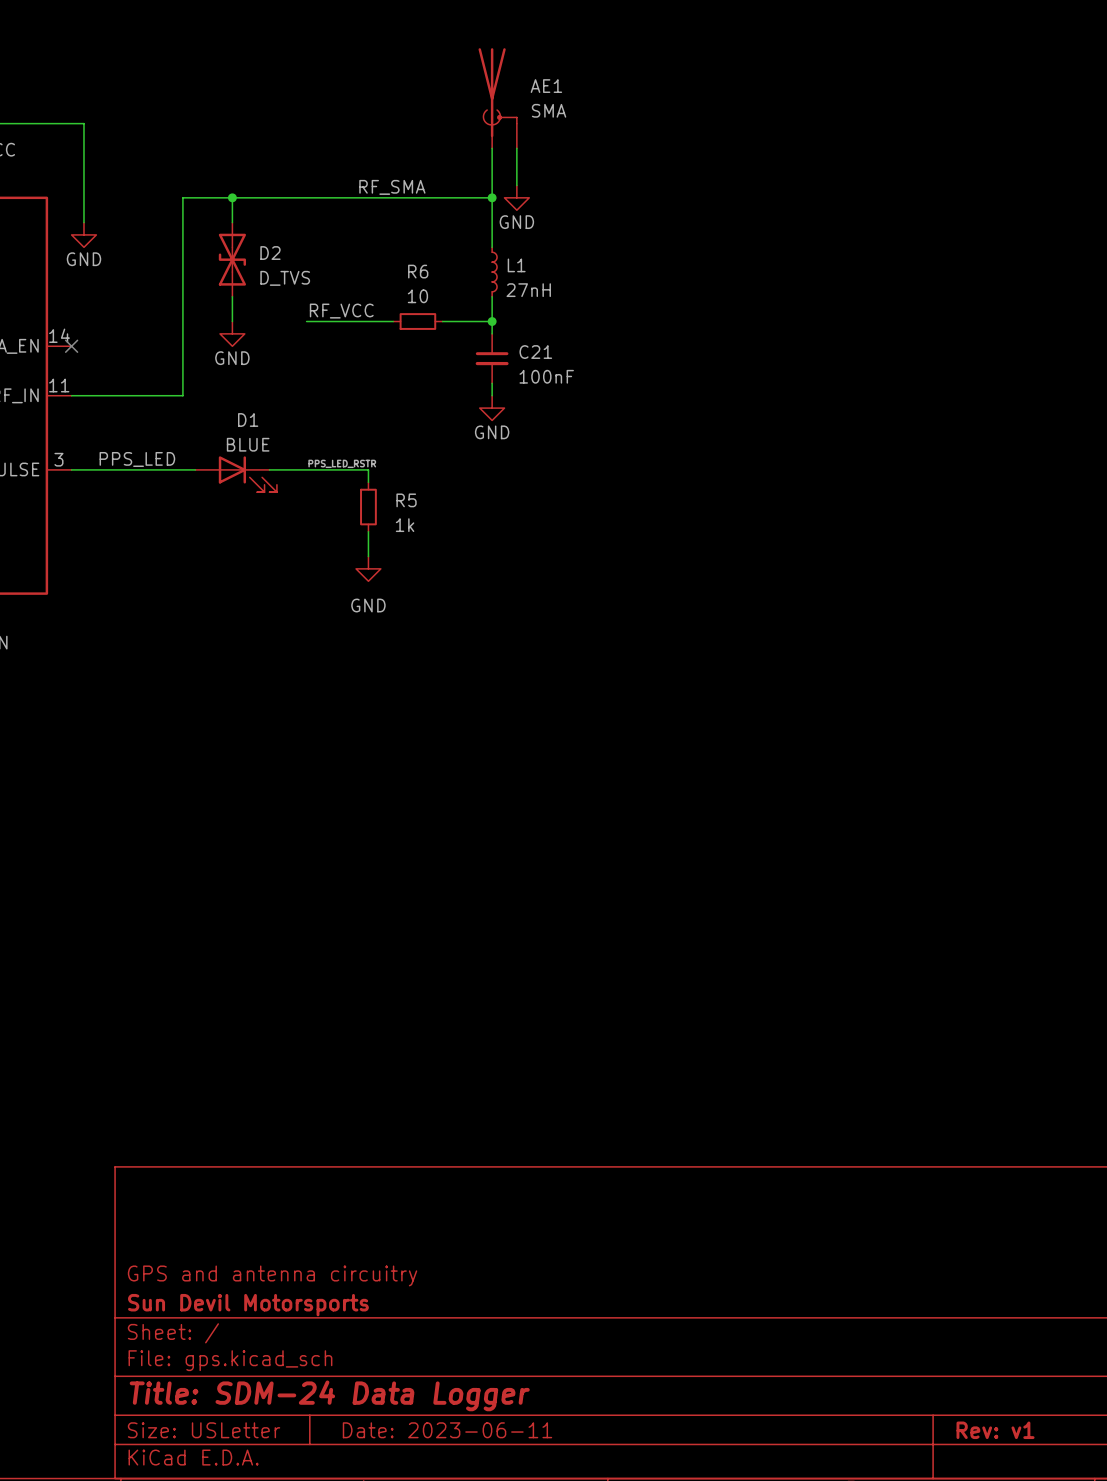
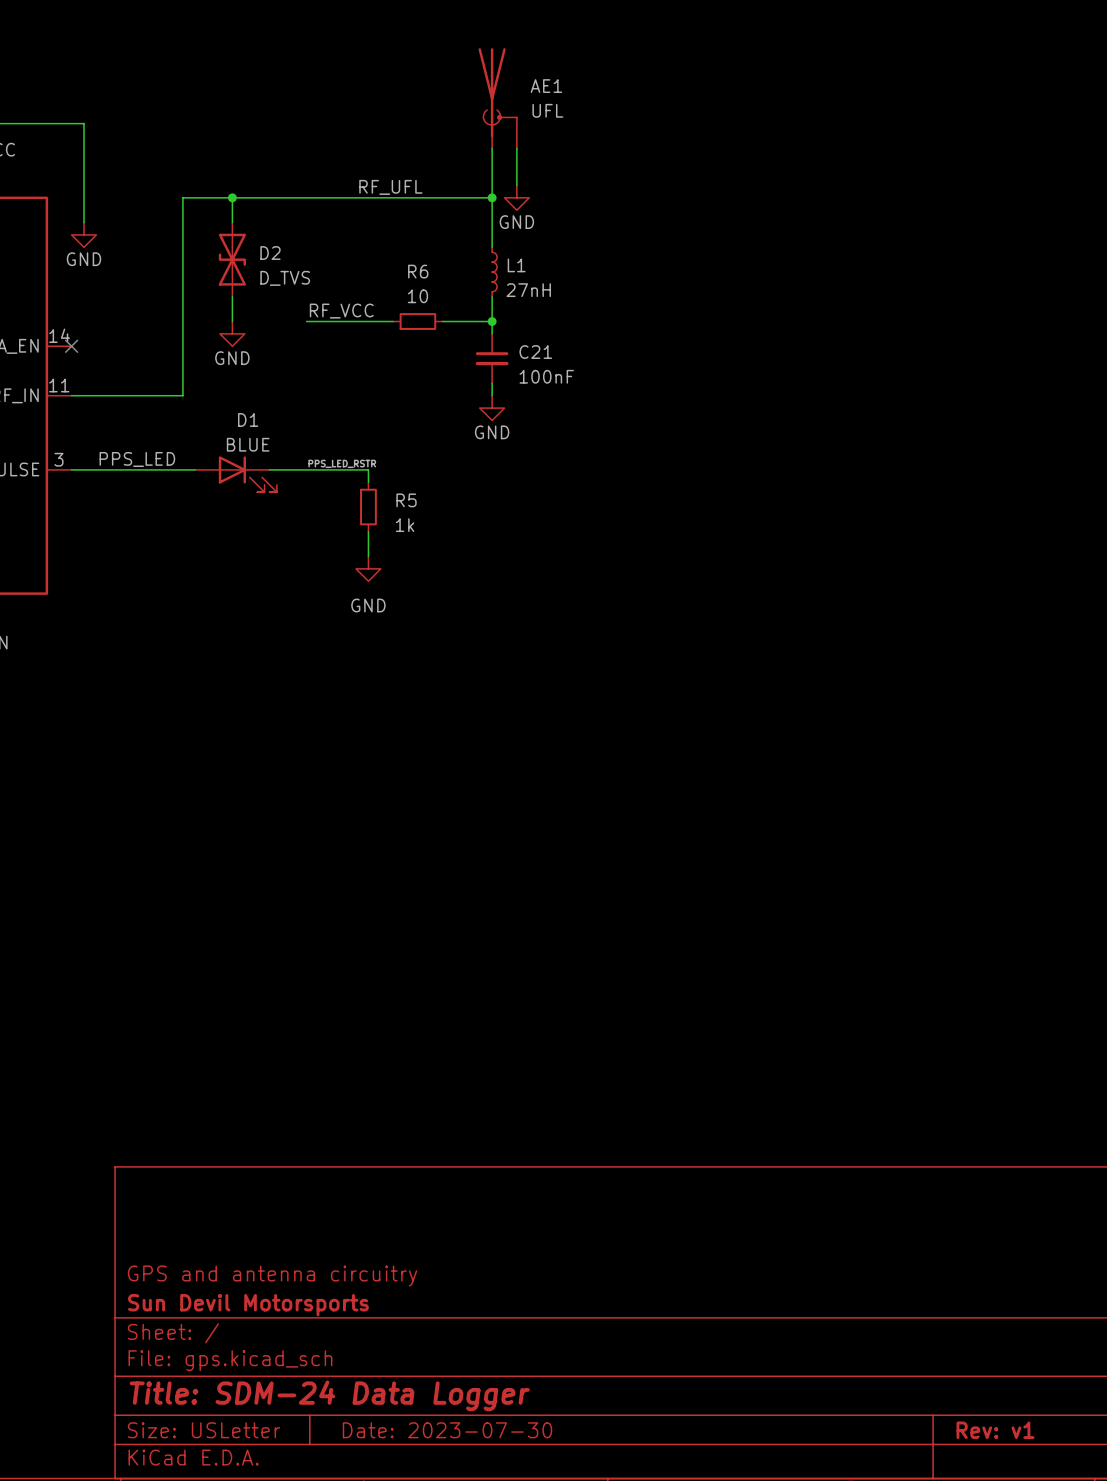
AE1 value: SMA (549, 110) -> UFL (547, 110)
label: RF_SMA (392, 187) -> RF_UFL (390, 187)
title block: Date: 2023-06-11 (447, 1430) -> Date: 2023-07-30 (447, 1430)

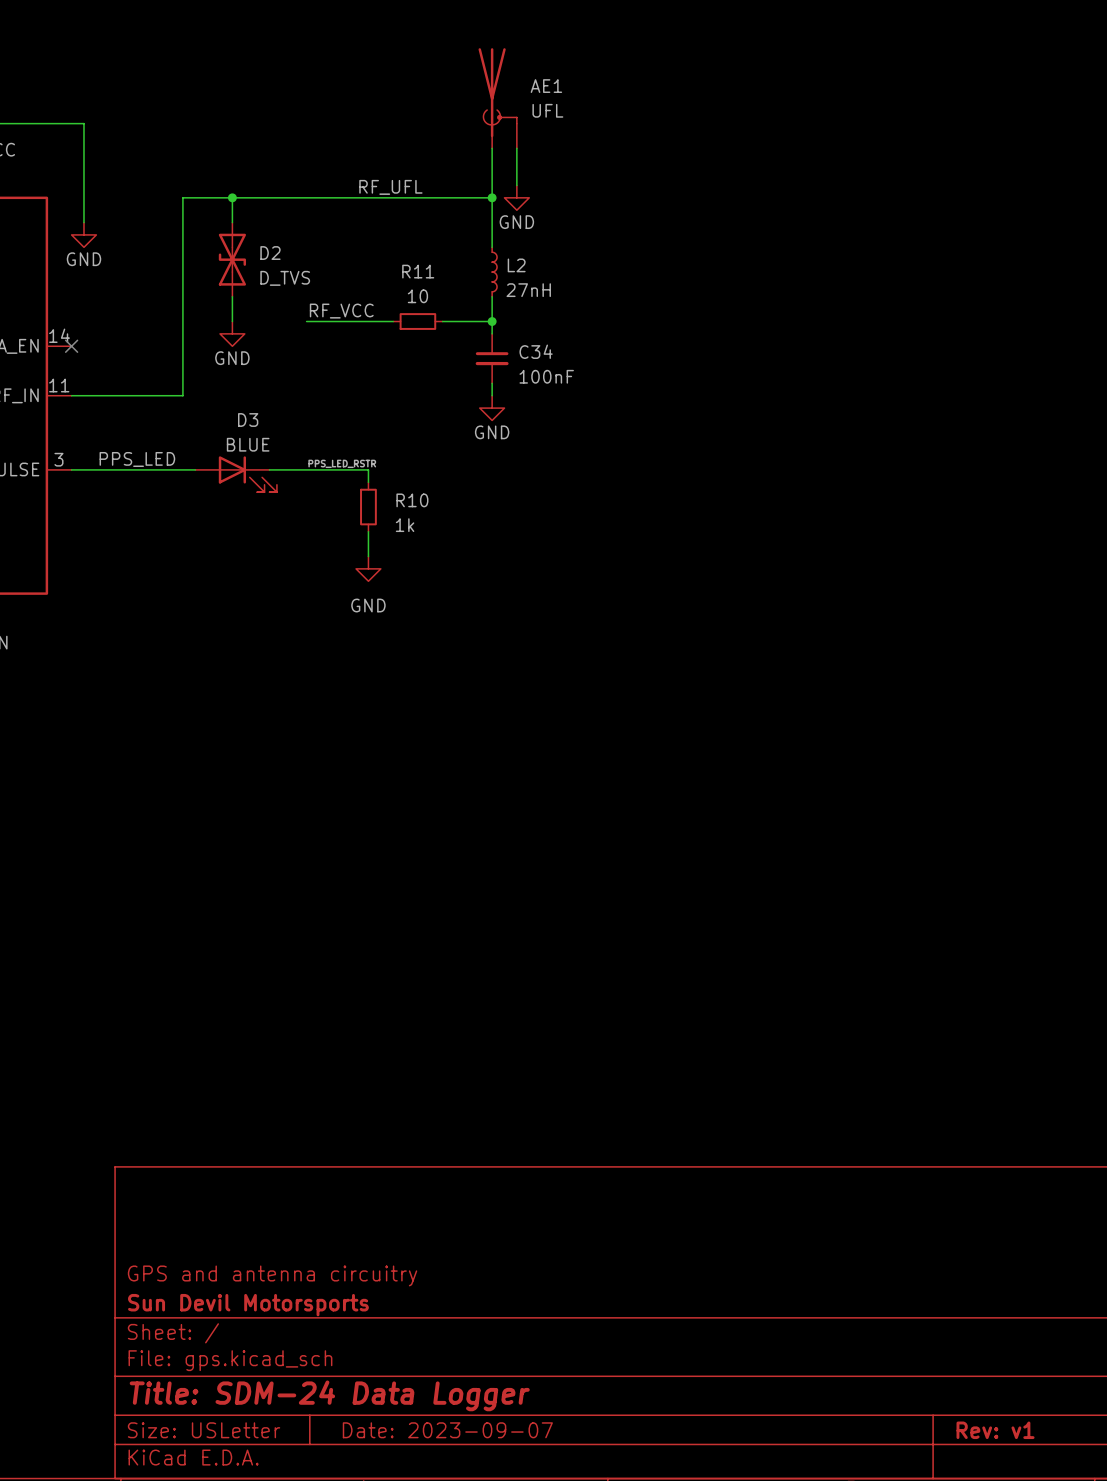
L1 name: L1 (516, 265) -> L2 (516, 265)
R6 name: R6 (418, 271) -> R11 (418, 271)
C21 name: C21 (535, 352) -> C34 (536, 351)
D1 name: D1 (248, 419) -> D3 (248, 419)
R5 name: R5 (406, 500) -> R10 (412, 500)
title block: Date: 2023-07-30 (447, 1430) -> Date: 2023-09-07 (447, 1430)

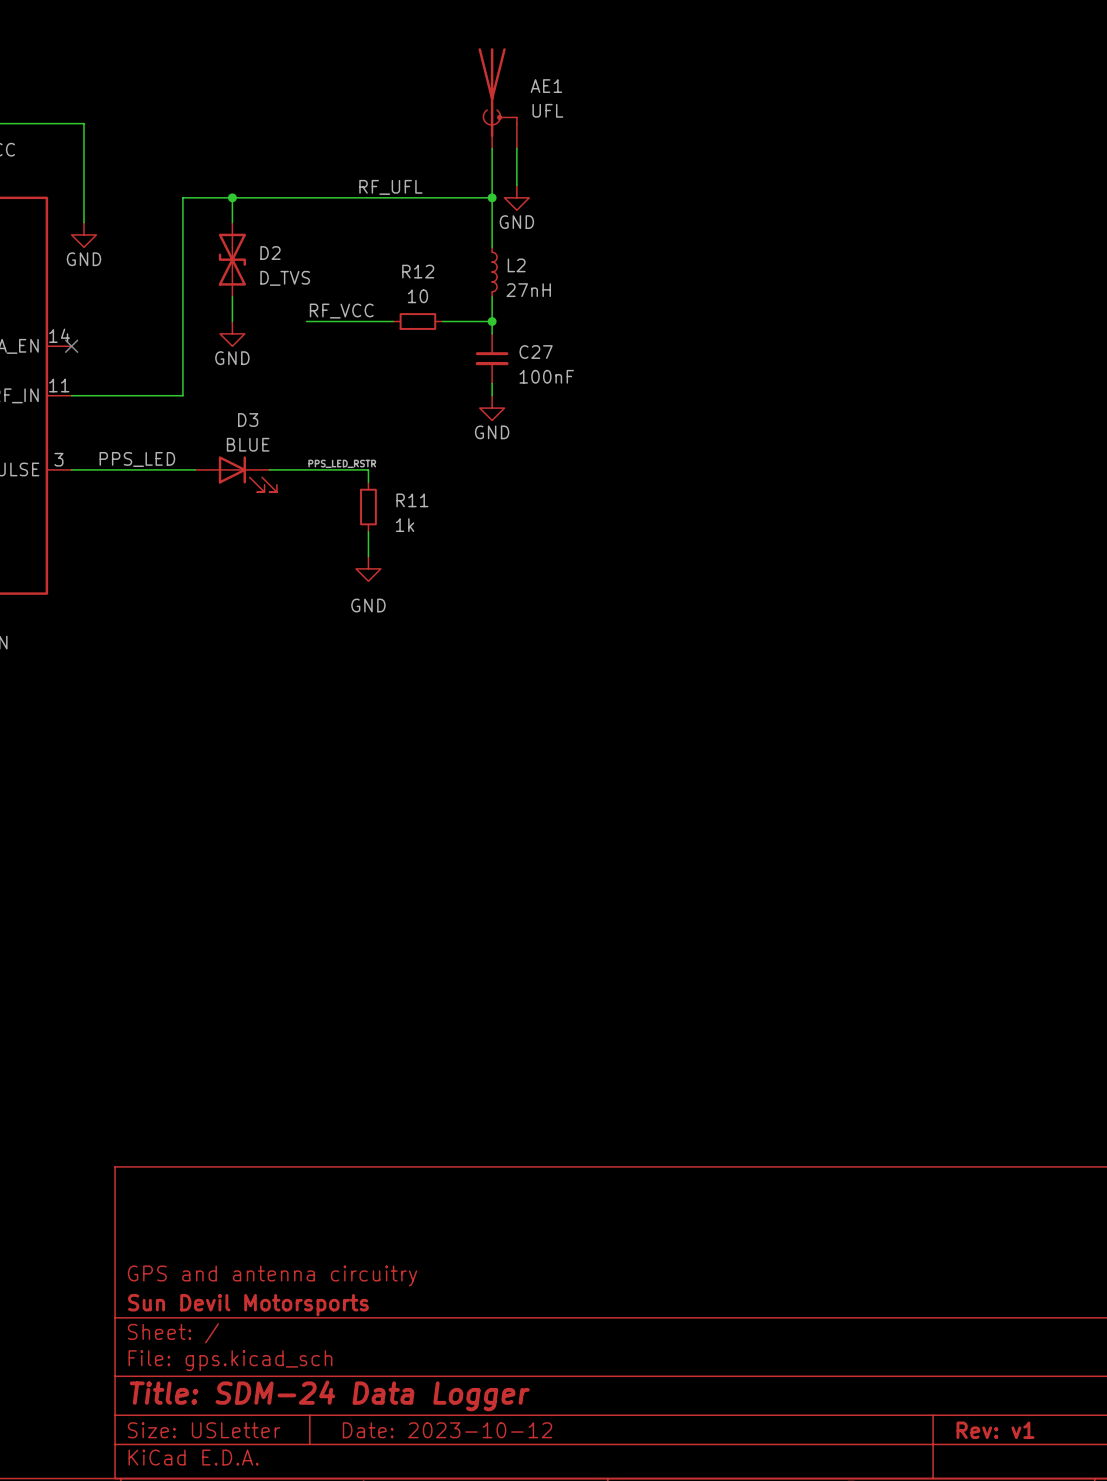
R11 name: R11 (418, 271) -> R12 (418, 271)
C34 name: C34 (536, 351) -> C27 (536, 352)
R10 name: R10 (412, 500) -> R11 (412, 500)
title block: Date: 2023-09-07 (447, 1430) -> Date: 2023-10-12 (447, 1430)

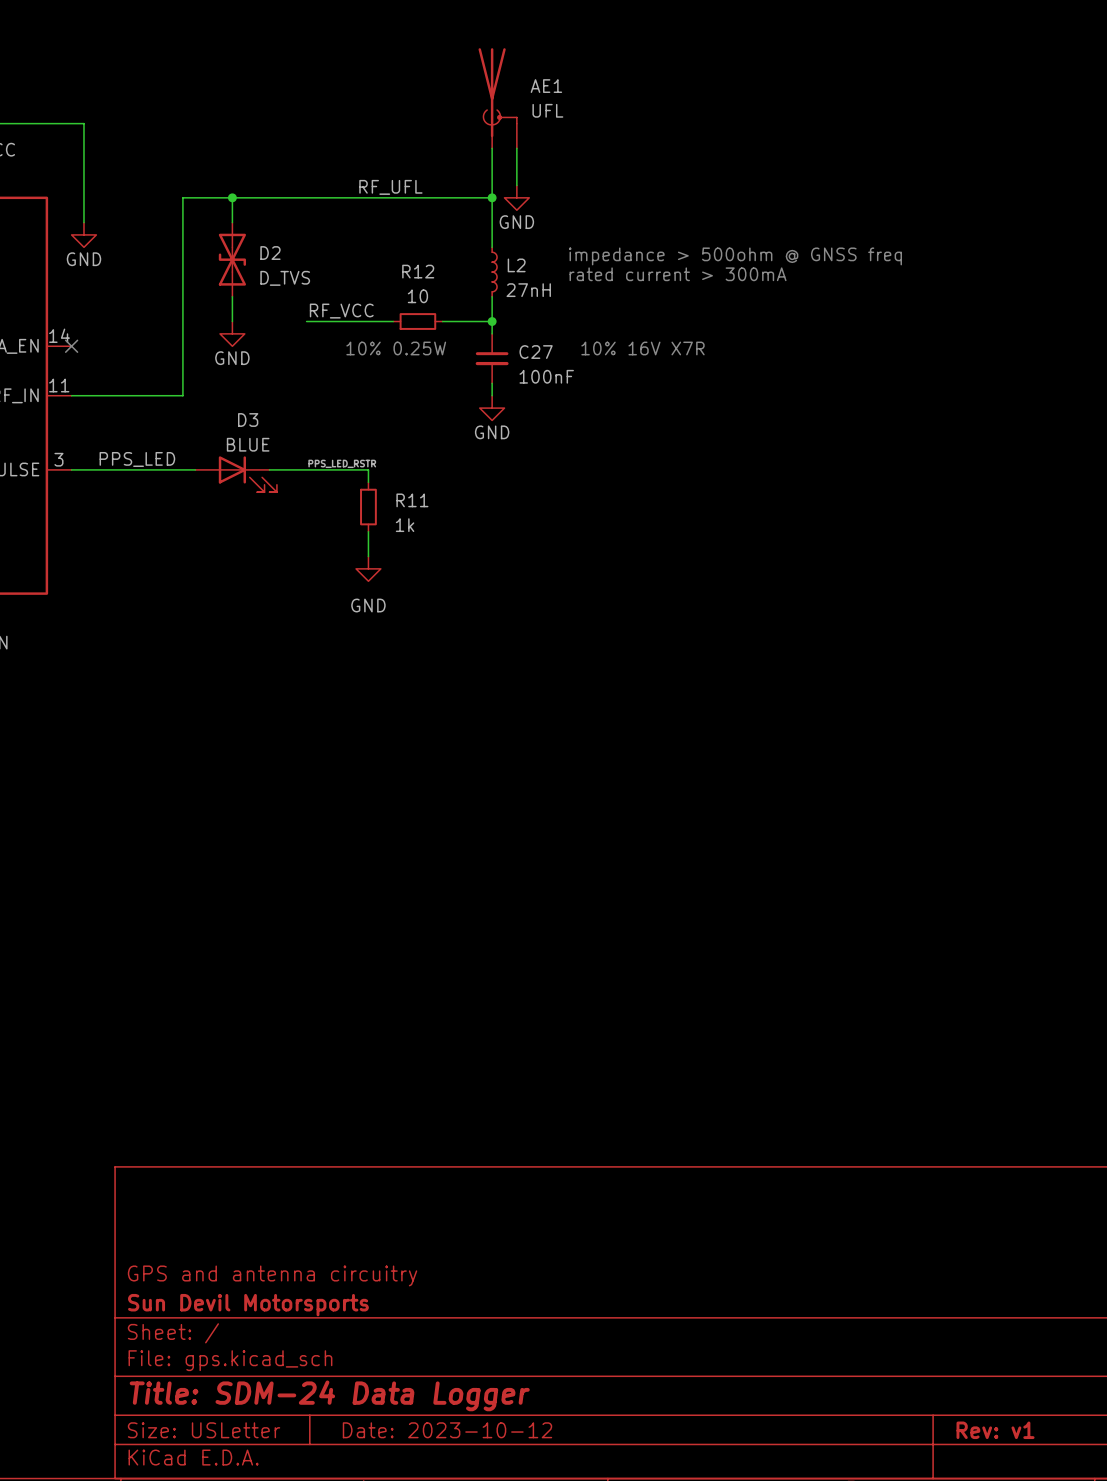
text: none -> impedance > 500ohm @ GNSS freq (735, 256)
text: none -> rated current > 300mA (678, 274)
text: none -> 10% 0.25W (396, 348)
text: none -> 10% 16V X7R (642, 348)

